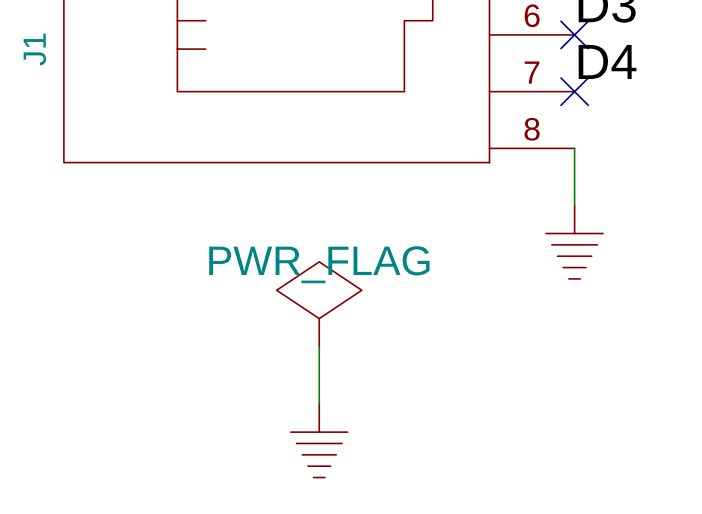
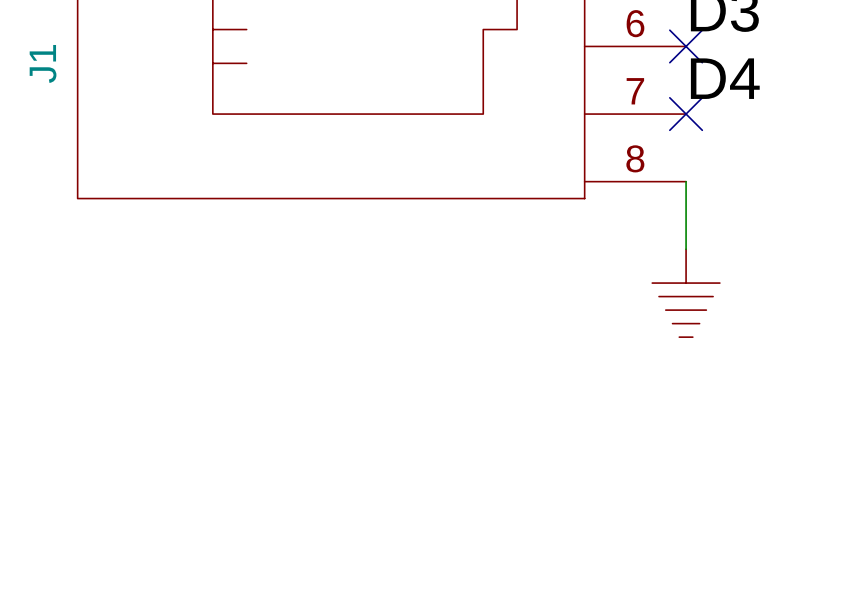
power symbol: PWR_FLAG (319, 304) -> none
wire: (319, 347) (319, 403) -> none
power symbol: (319, 440) -> none

